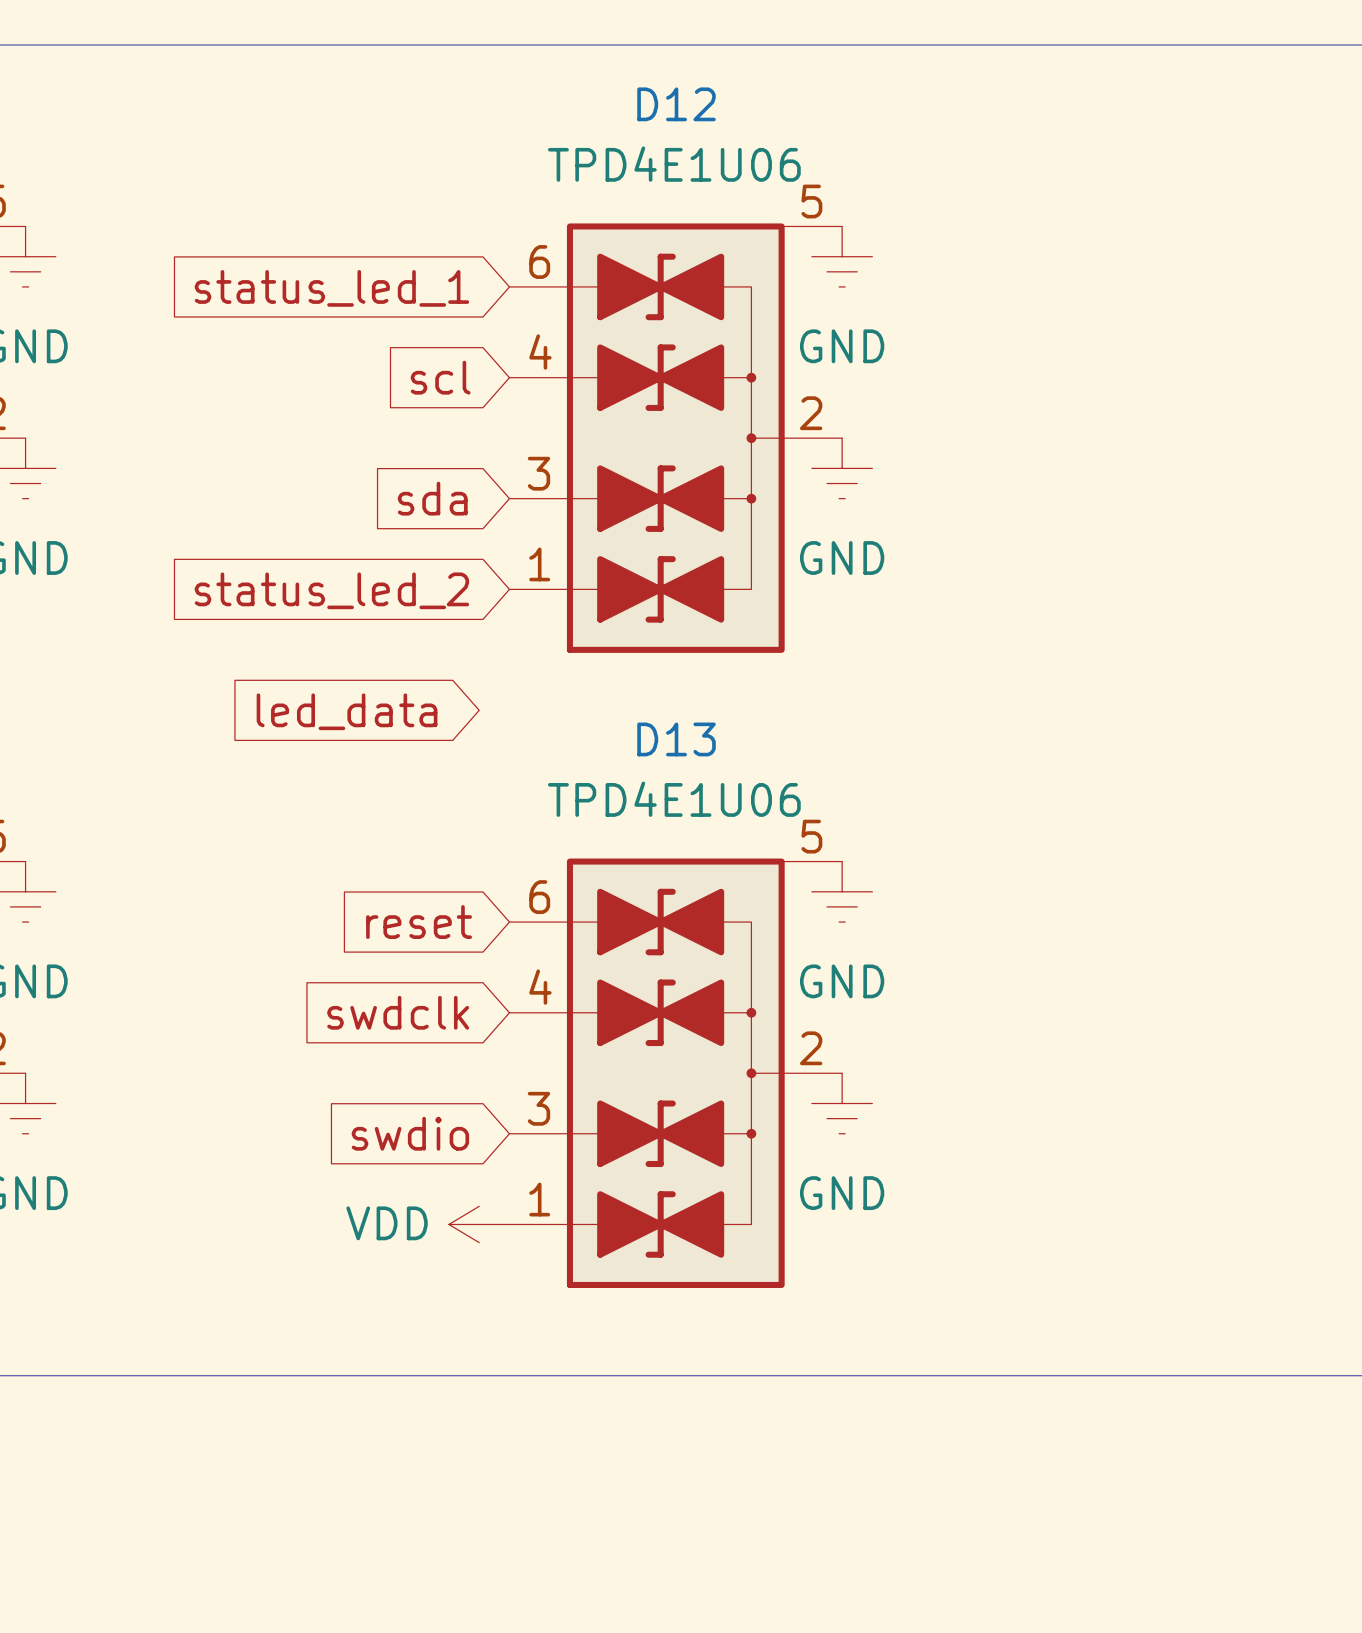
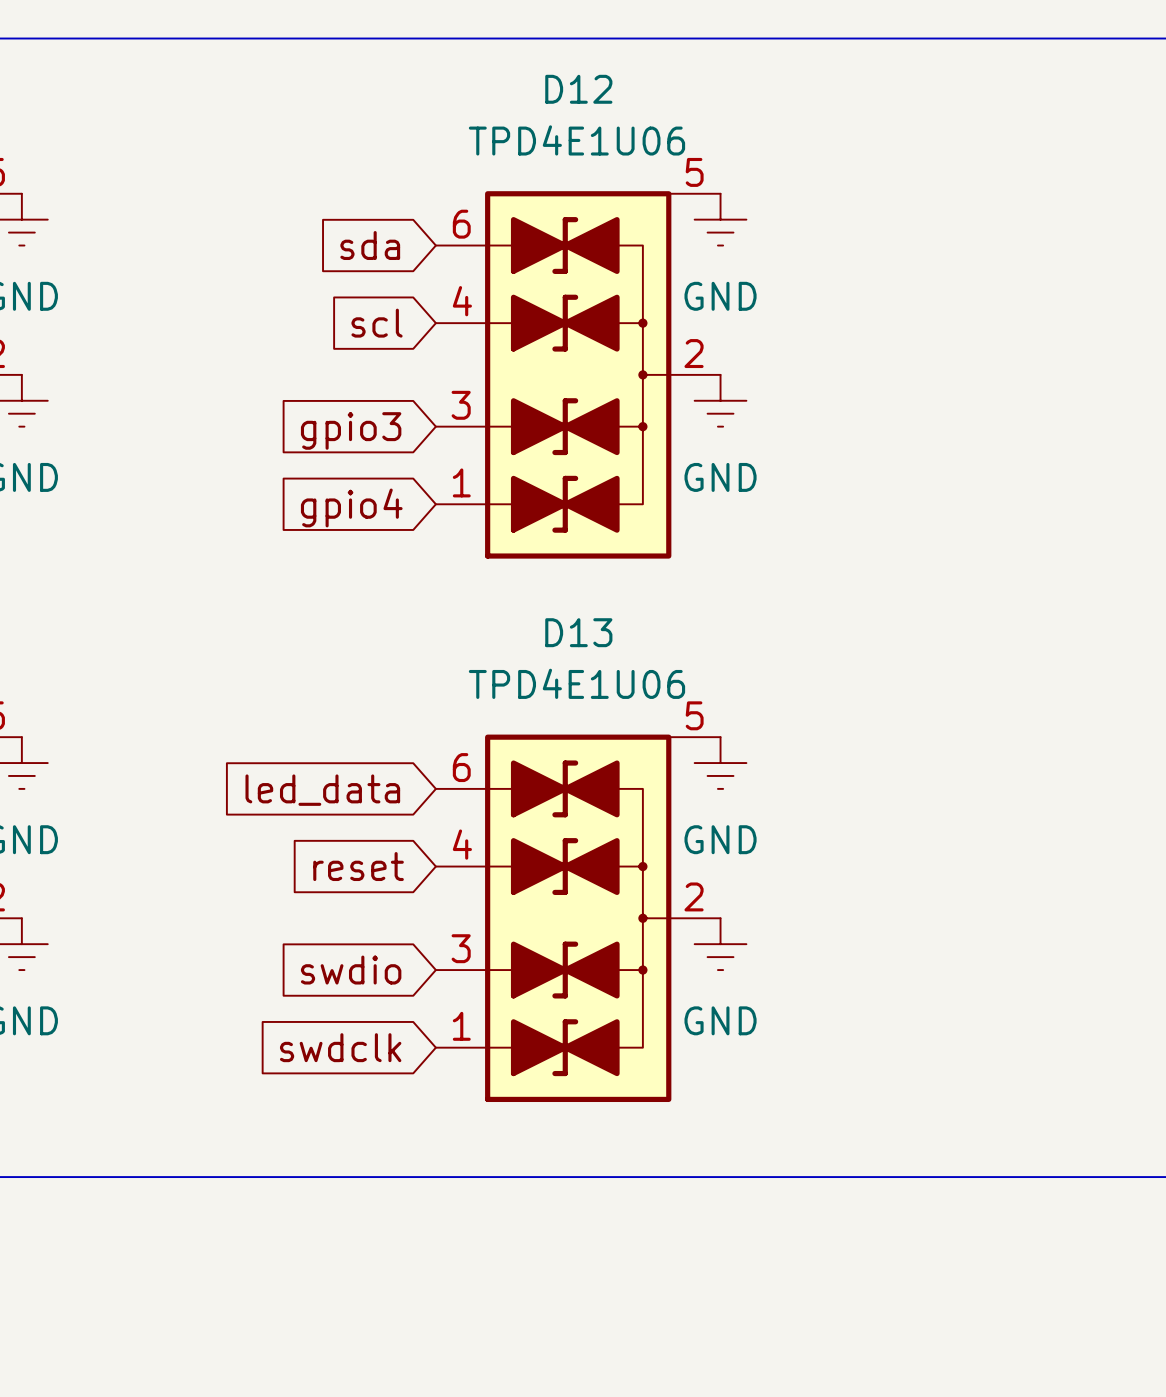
global label: status_led_1 (331, 288) -> sda (370, 245)
global label: sda (432, 498) -> gpio3 (351, 430)
global label: status_led_2 (331, 590) -> gpio4 (351, 507)
global label: led_data (347, 711) -> none
global label: reset (419, 922) -> led_data (322, 790)
global label: swdclk (398, 1012) -> reset (358, 866)
global label: none -> swdclk (340, 1047)
power symbol: VDD (479, 1224) -> none

